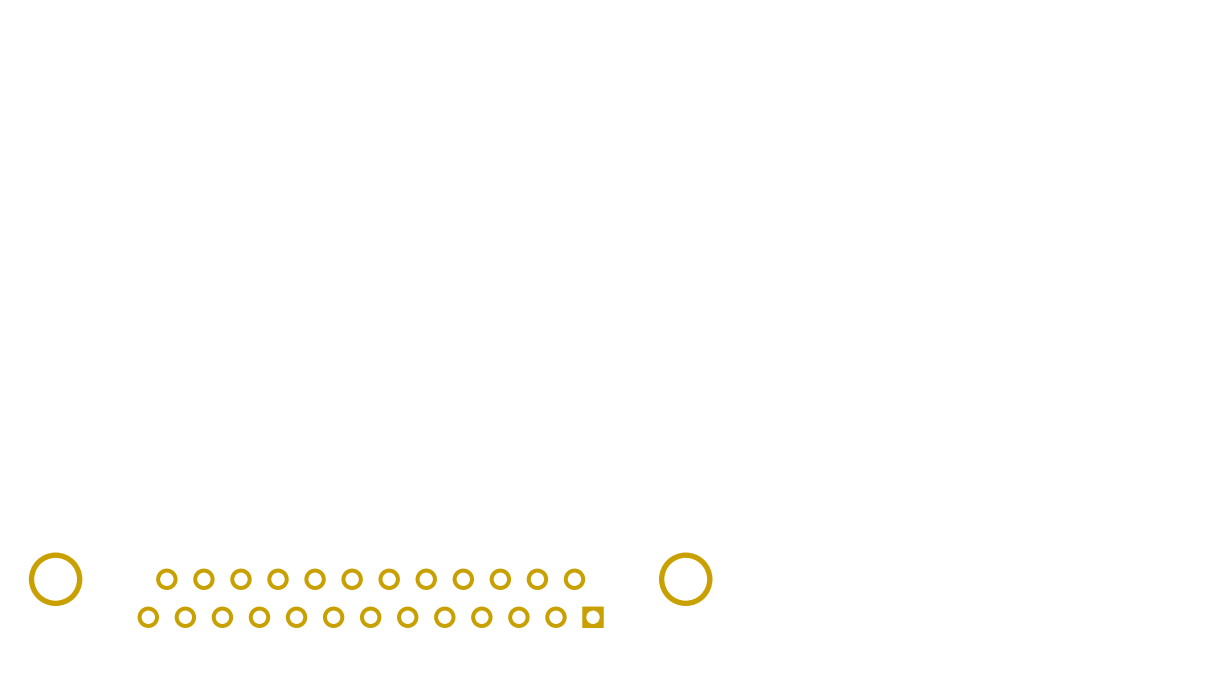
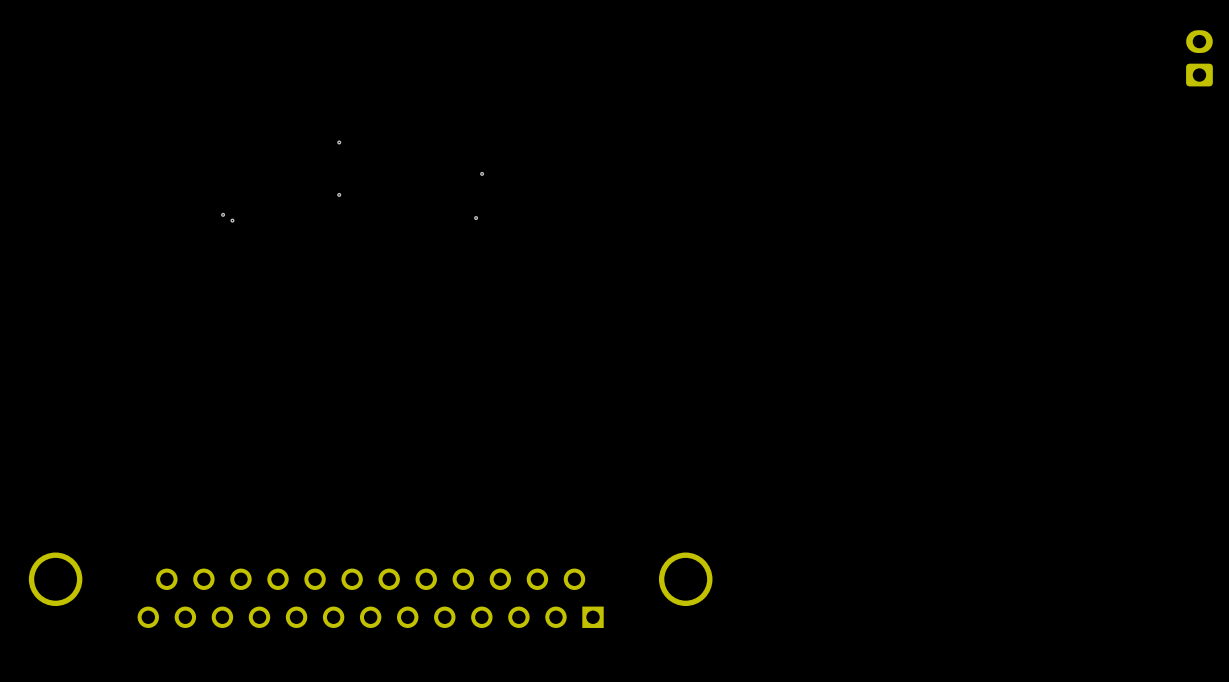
part: none -> (1199, 58)
via: none -> (339, 142)
via: none -> (482, 173)
via: none -> (339, 194)
via: none -> (223, 214)
via: none -> (476, 218)
via: none -> (232, 220)

